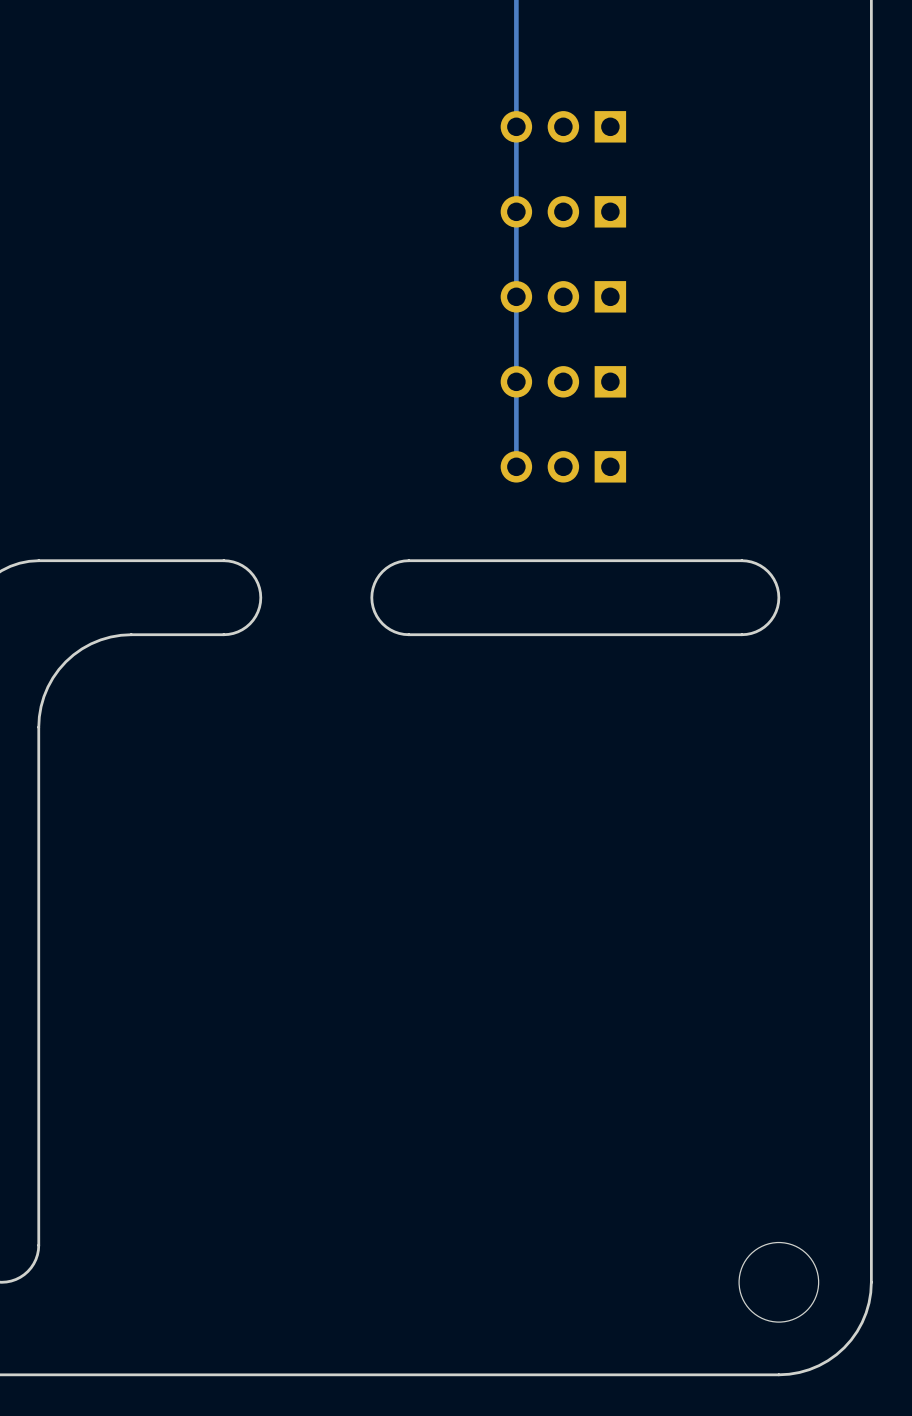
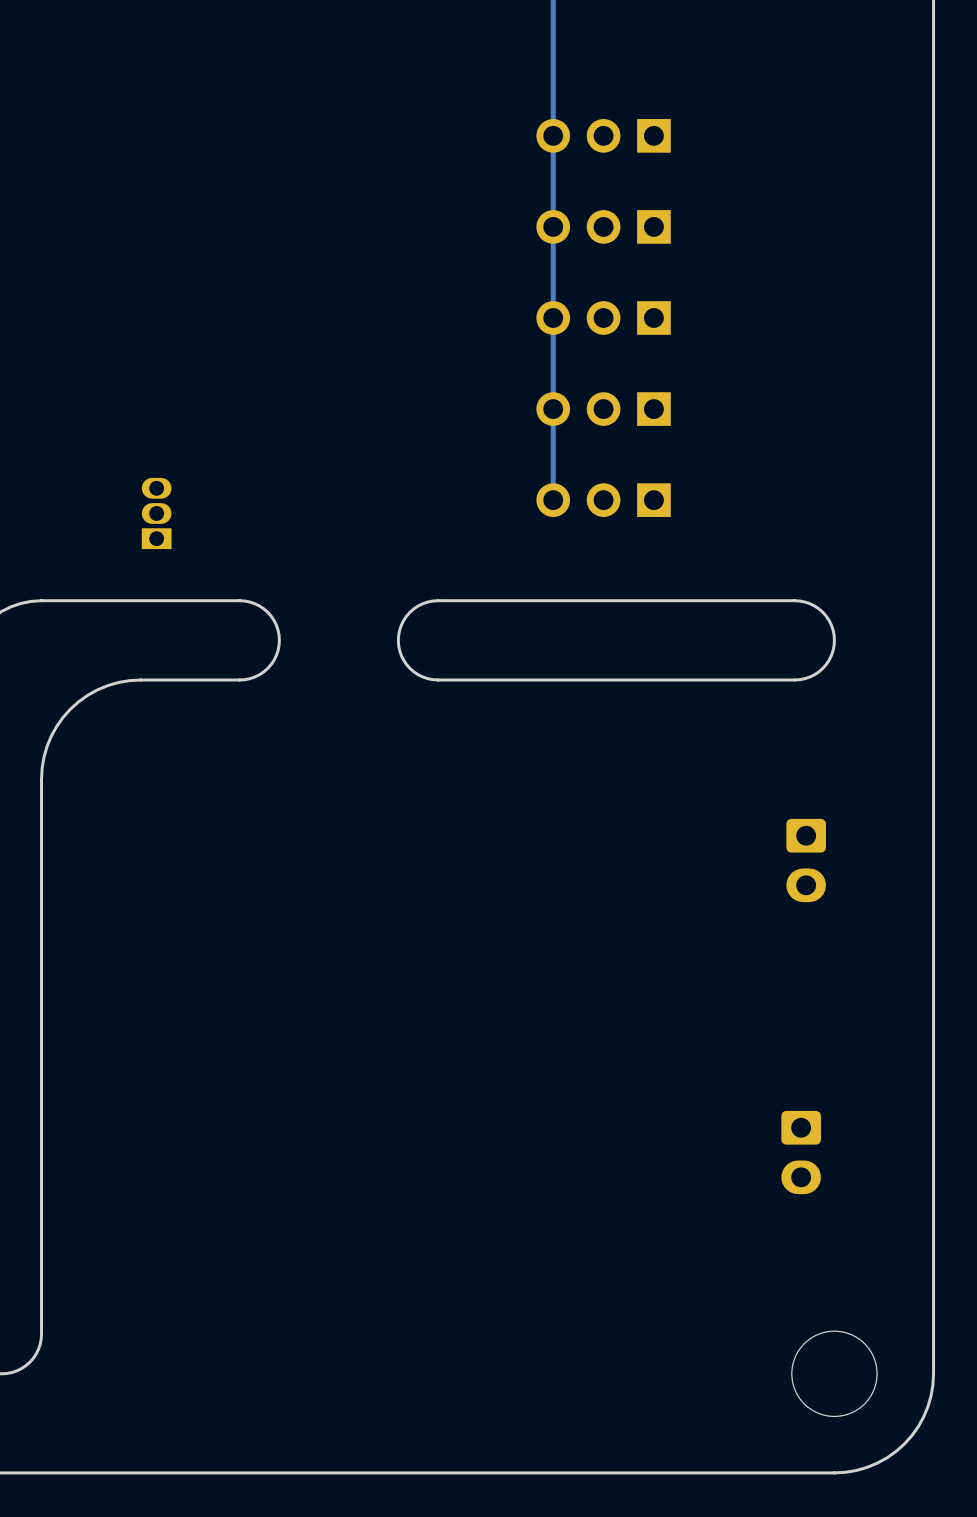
part: none -> (156, 513)
part: none -> (806, 860)
part: none -> (801, 1152)

